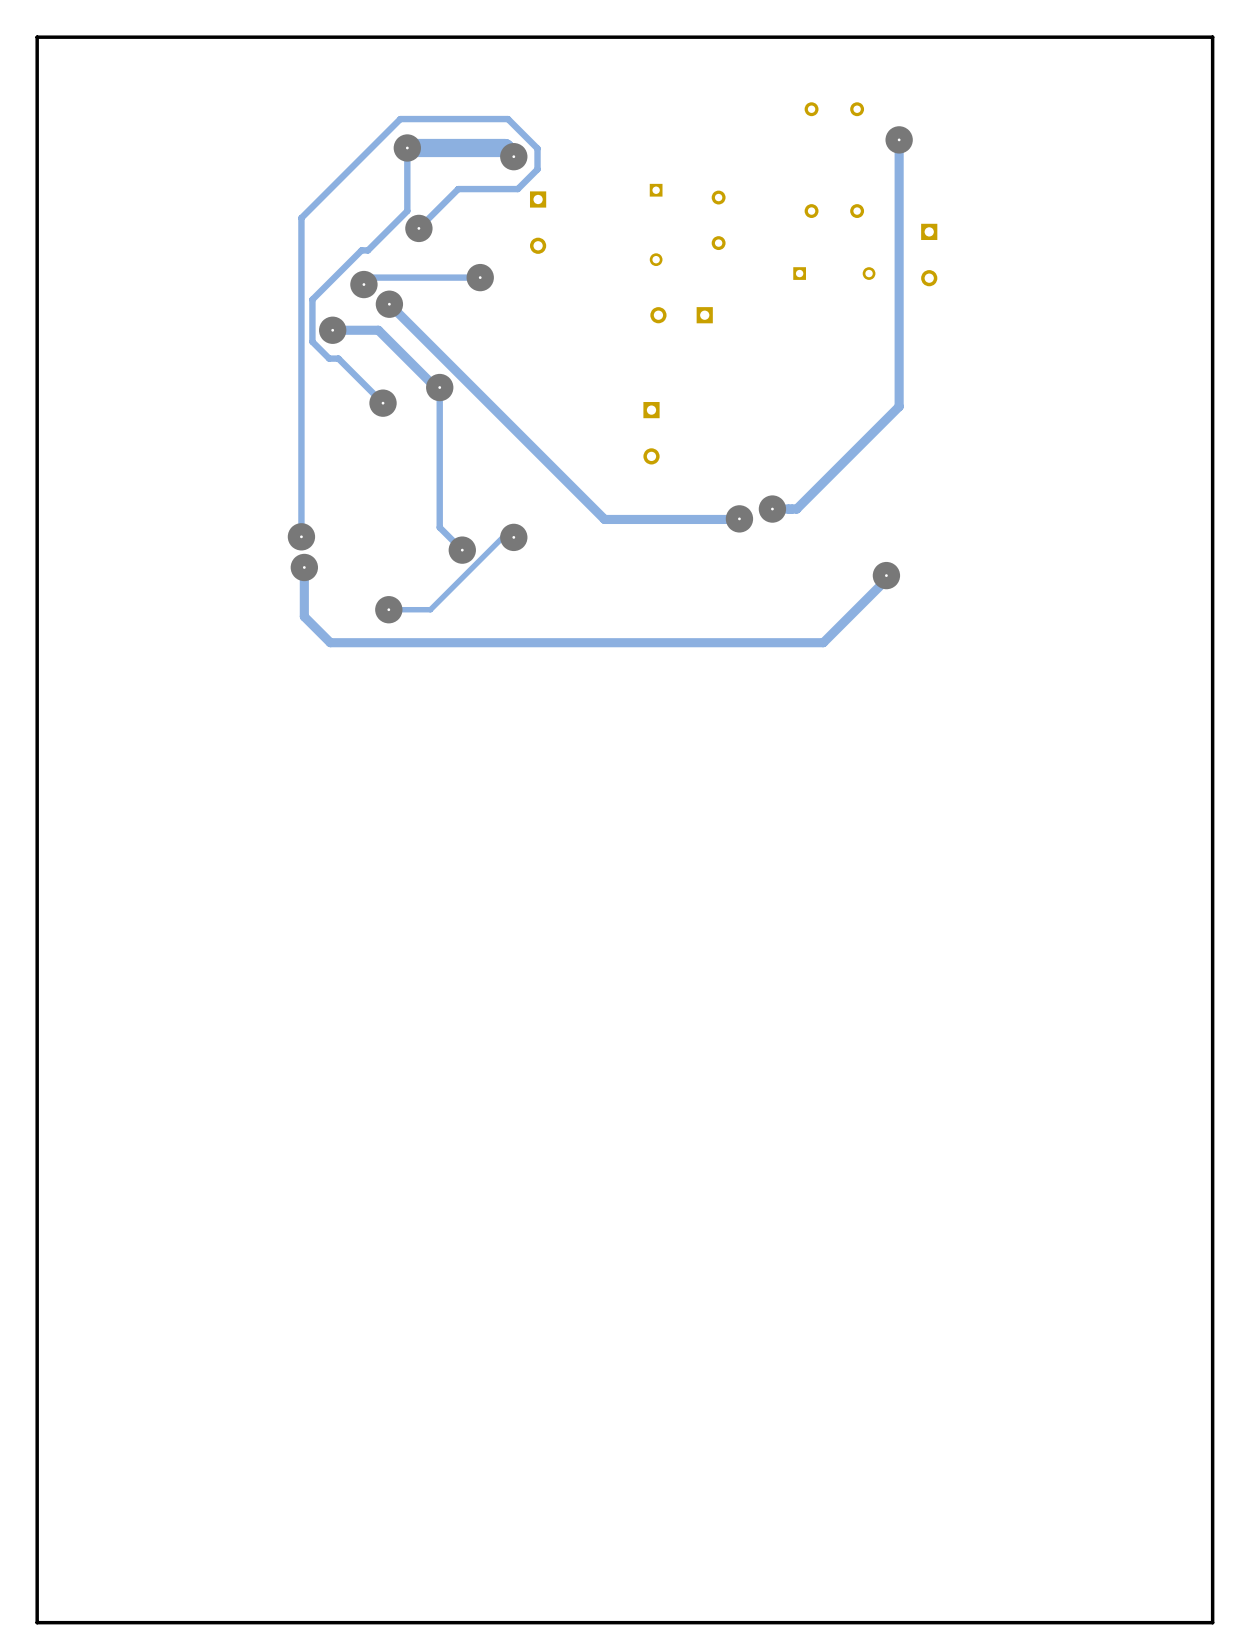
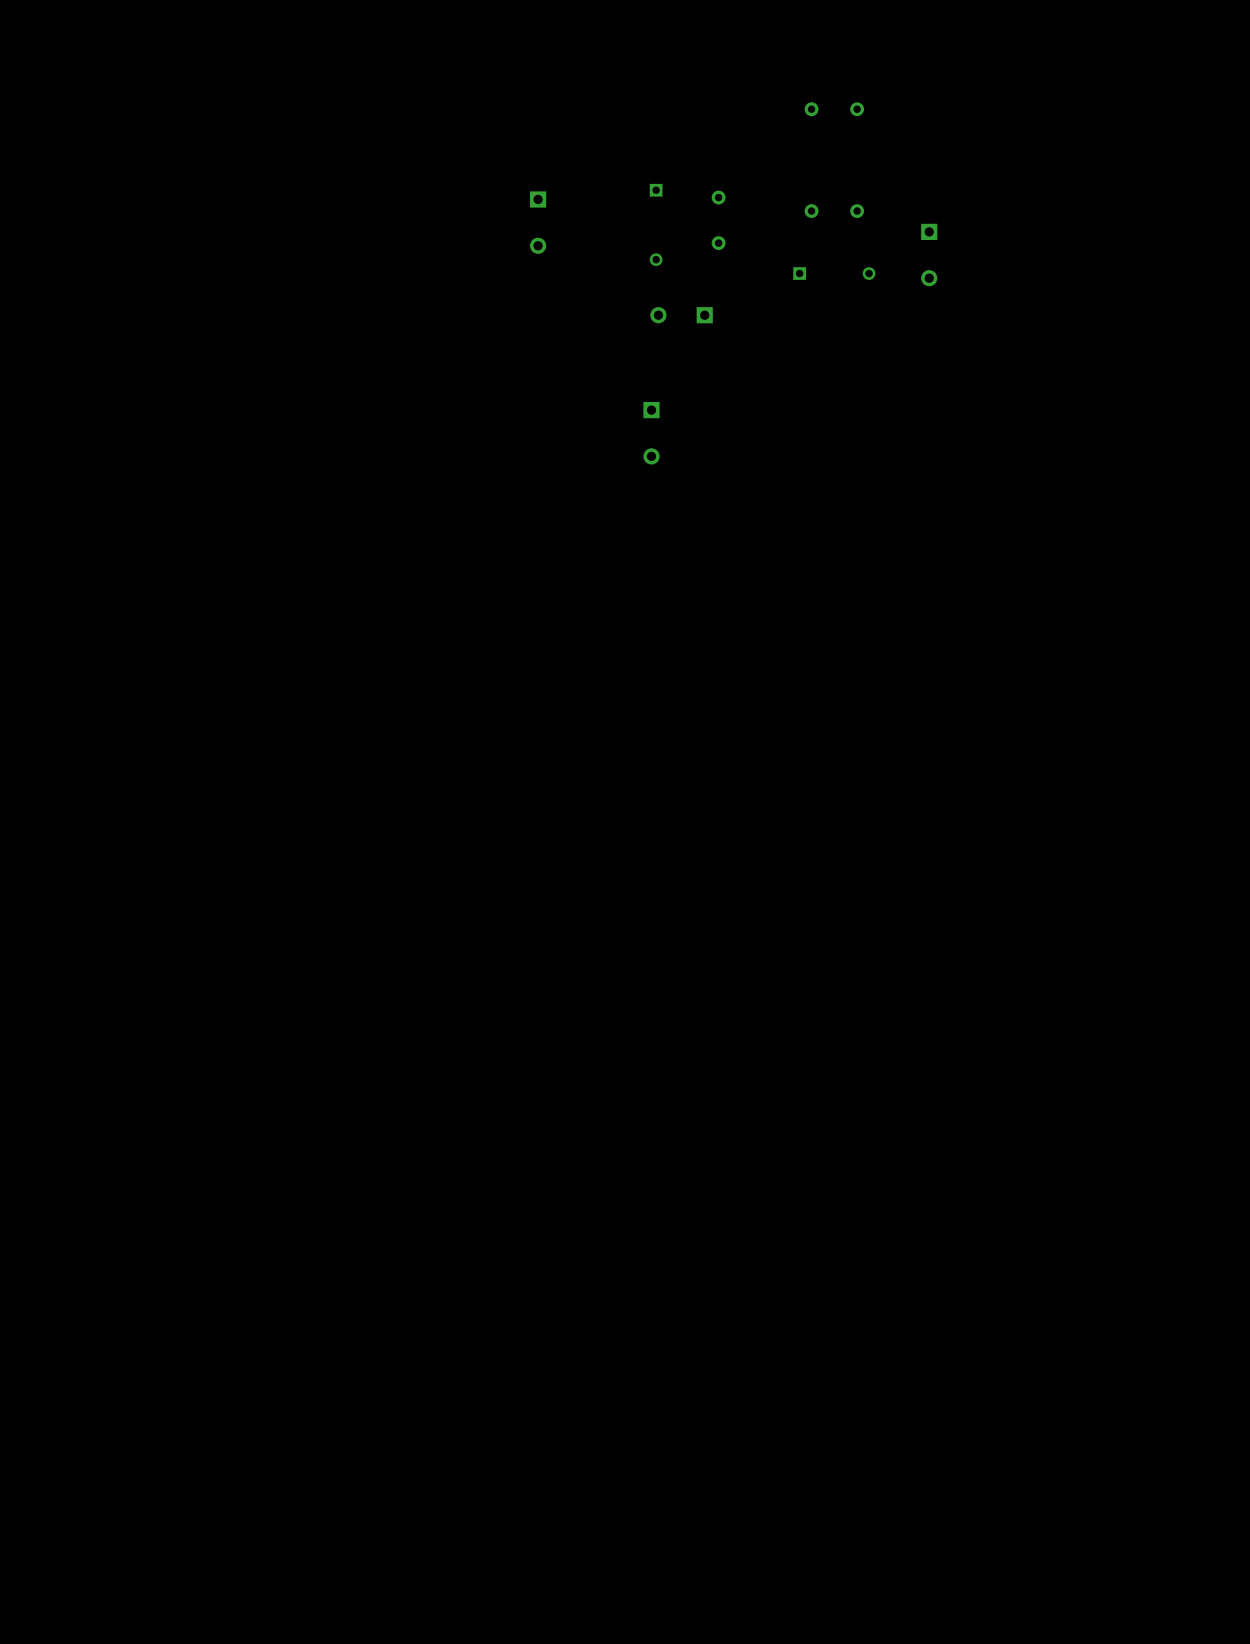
board edge: (1212, 37) (1212, 1622) (37, 1622) (37, 37) (1212, 37) -> none
track: (899, 139) (899, 406) (796, 509) (772, 509) -> none
via: (899, 139) -> none
via: (407, 147) -> none
track: (513, 156) (505, 147) (407, 147) (407, 211) (367, 250) (361, 250) (312, 299) (312, 341) (329, 358) (338, 358) (383, 403) -> none
via: (513, 156) -> none
track: (418, 228) (458, 189) (517, 189) (537, 169) (537, 148) (508, 119) (400, 119) (301, 218) (301, 536) -> none
via: (418, 228) -> none
track: (480, 277) (370, 277) (363, 284) -> none
via: (480, 277) -> none
via: (363, 284) -> none
track: (389, 304) (604, 519) (739, 518) -> none
via: (389, 304) -> none
track: (332, 330) (378, 330) (435, 387) (439, 387) (439, 527) (462, 550) -> none
via: (332, 330) -> none
via: (439, 387) -> none
via: (383, 403) -> none
via: (772, 509) -> none
via: (739, 518) -> none
via: (301, 536) -> none
track: (513, 537) (502, 537) (430, 609) (388, 609) -> none
via: (513, 537) -> none
via: (462, 550) -> none
track: (304, 567) (304, 616) (330, 642) (823, 642) (886, 579) (886, 575) -> none
via: (304, 567) -> none
via: (886, 575) -> none
via: (388, 609) -> none

